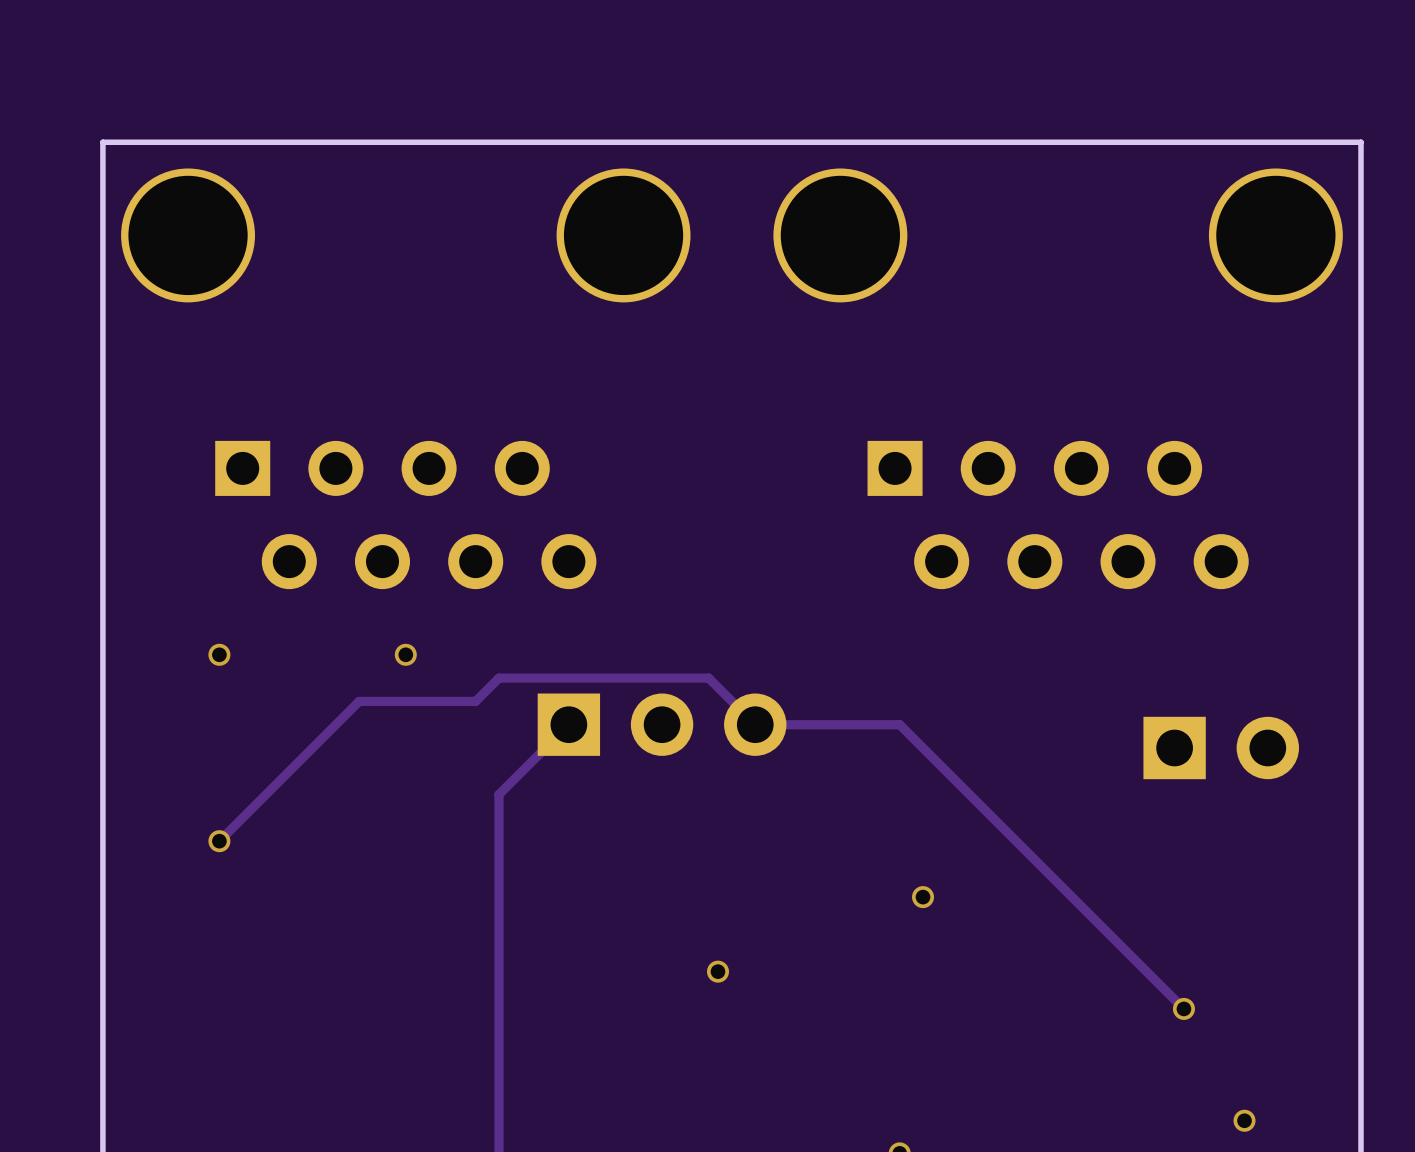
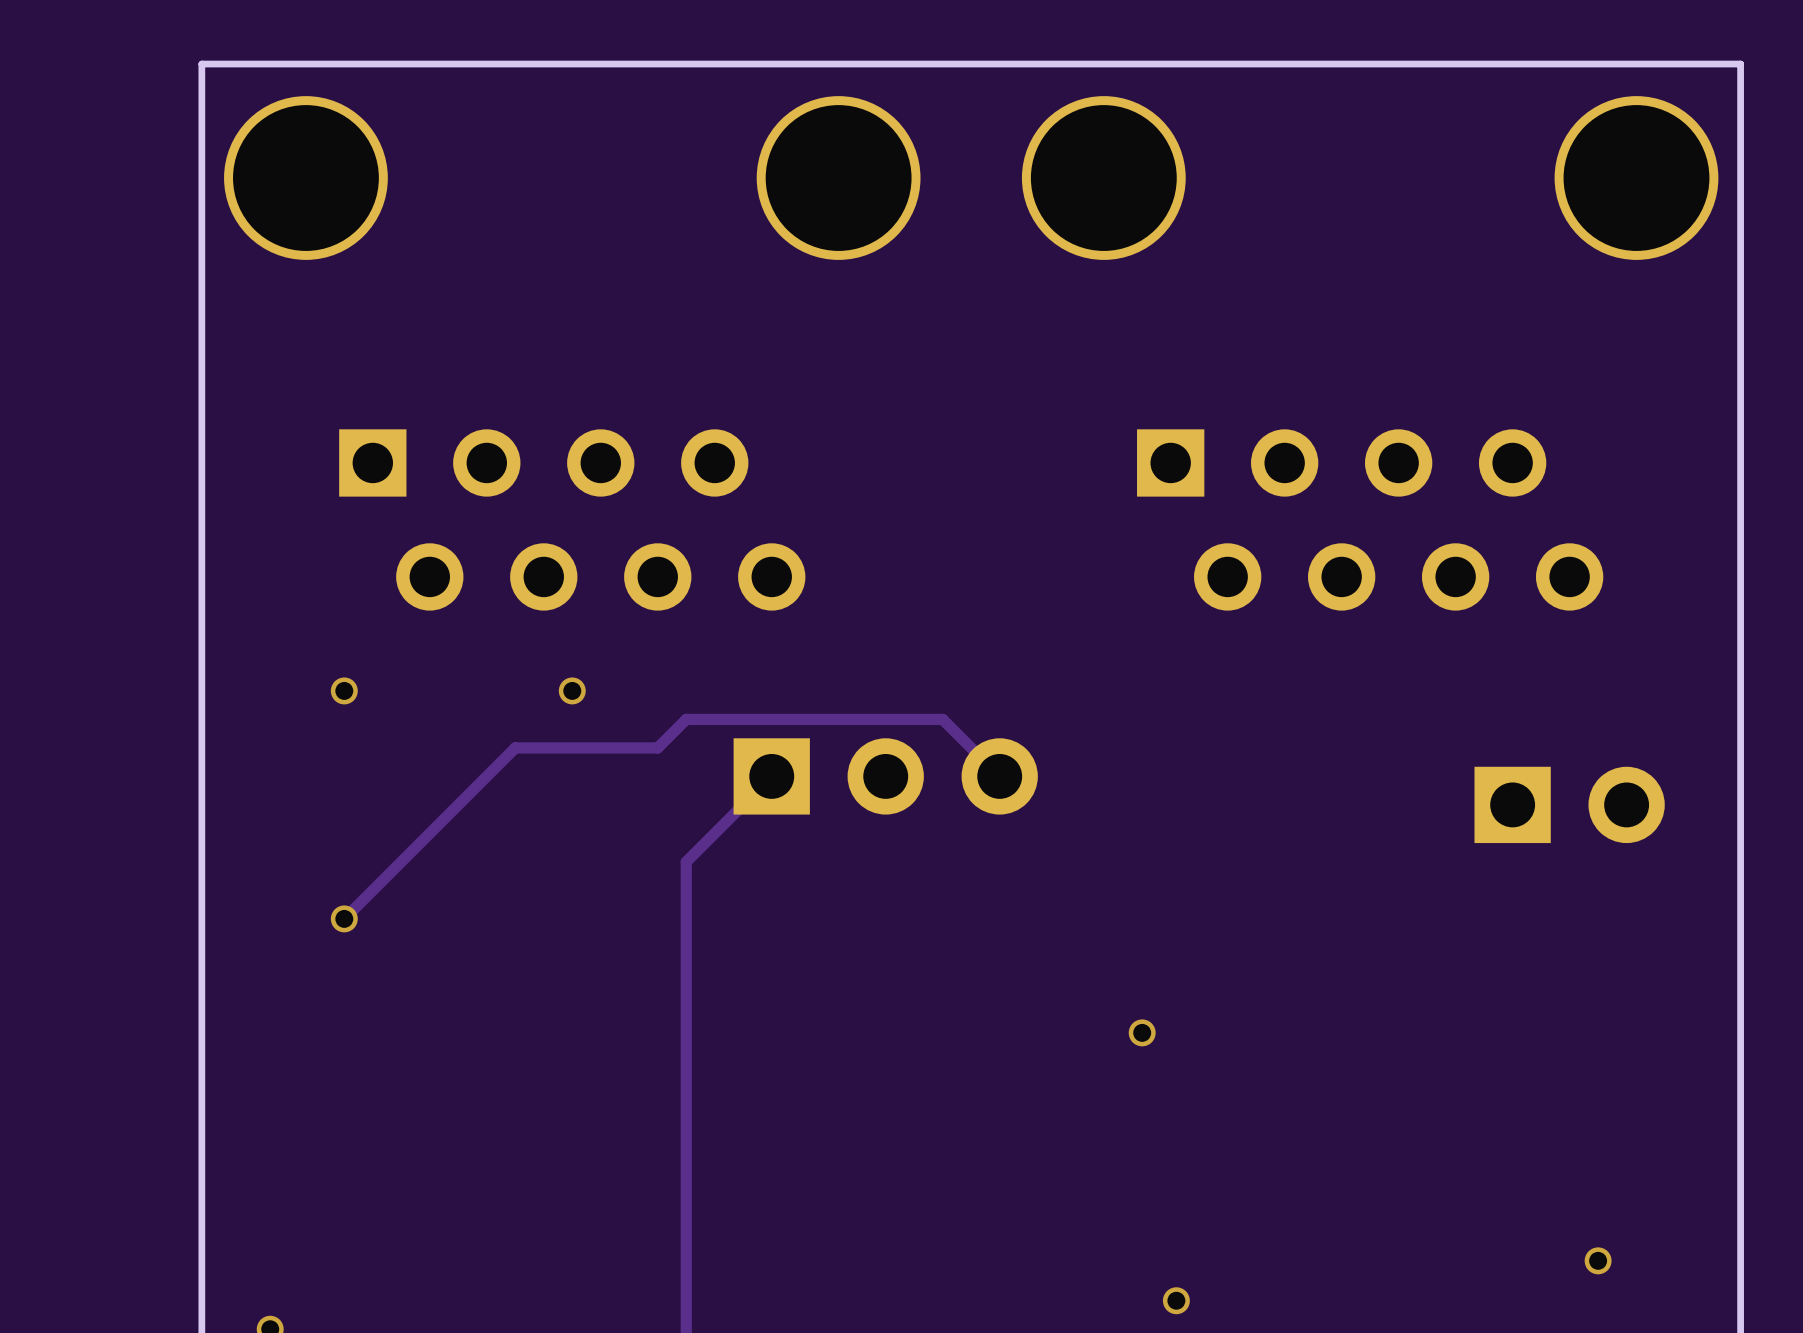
track: (755, 724) (899, 724) (1183, 1008) -> none
via position: (923, 897) -> (1142, 1032)
via: (717, 971) -> none
via: (1183, 1008) -> none

